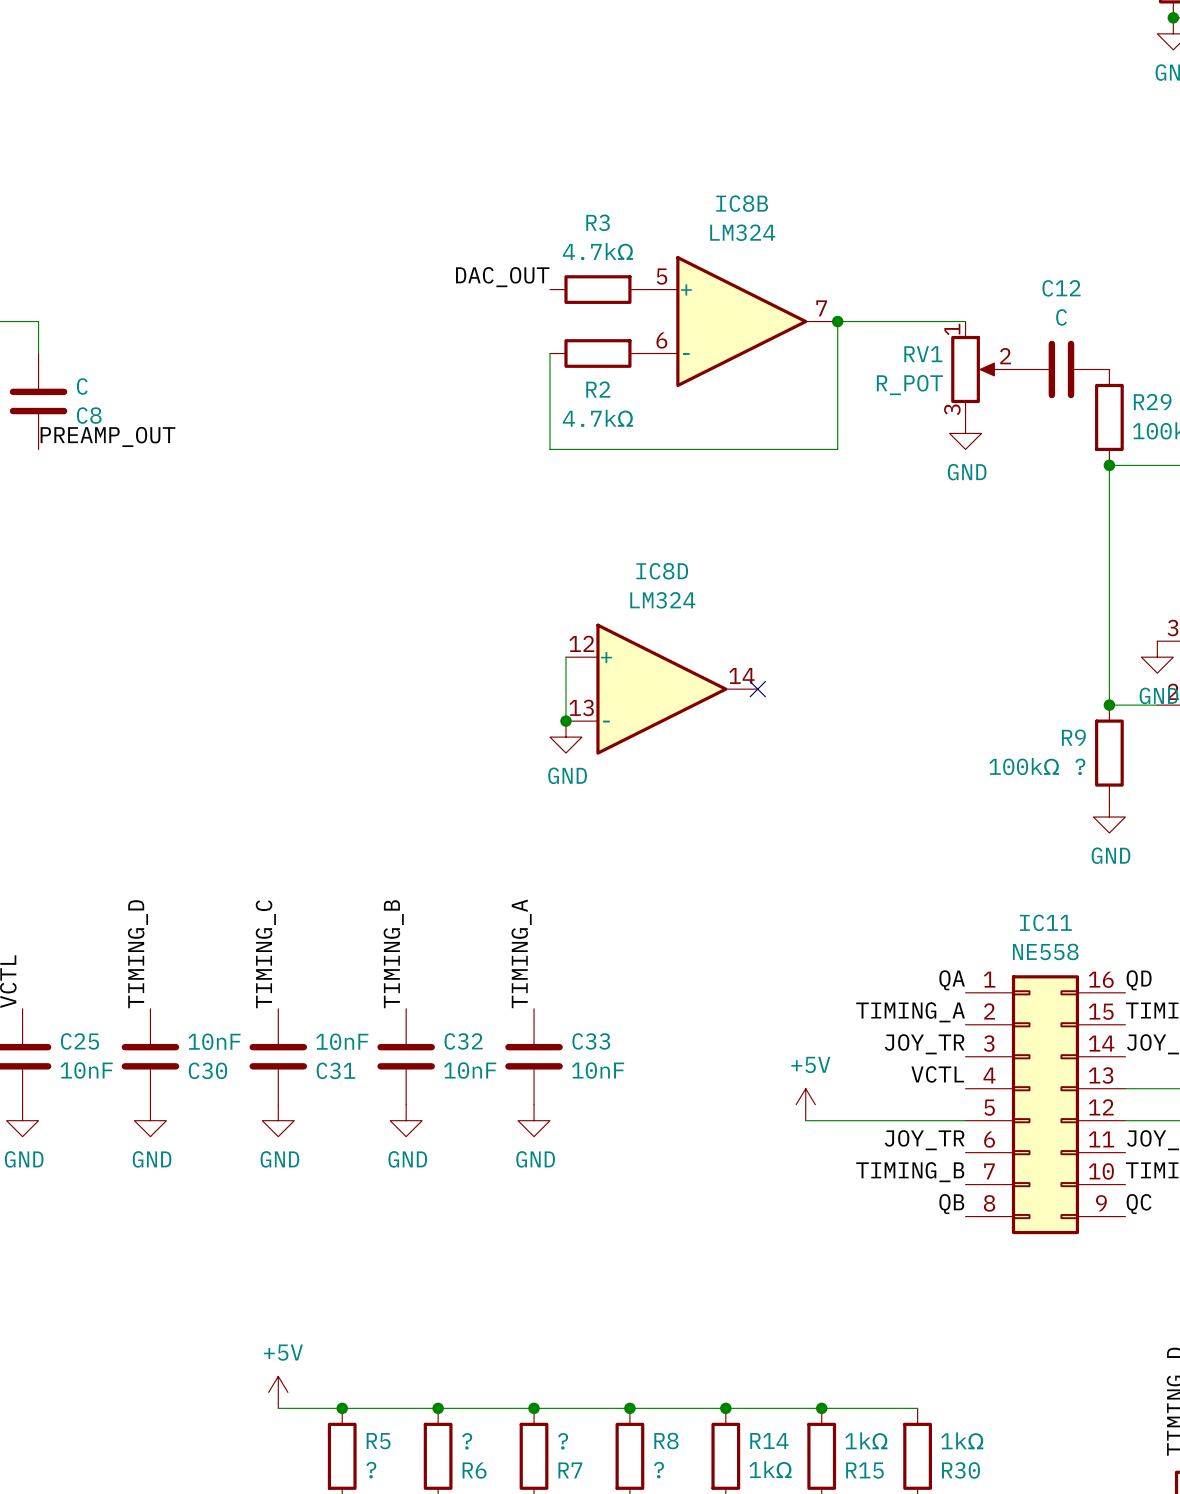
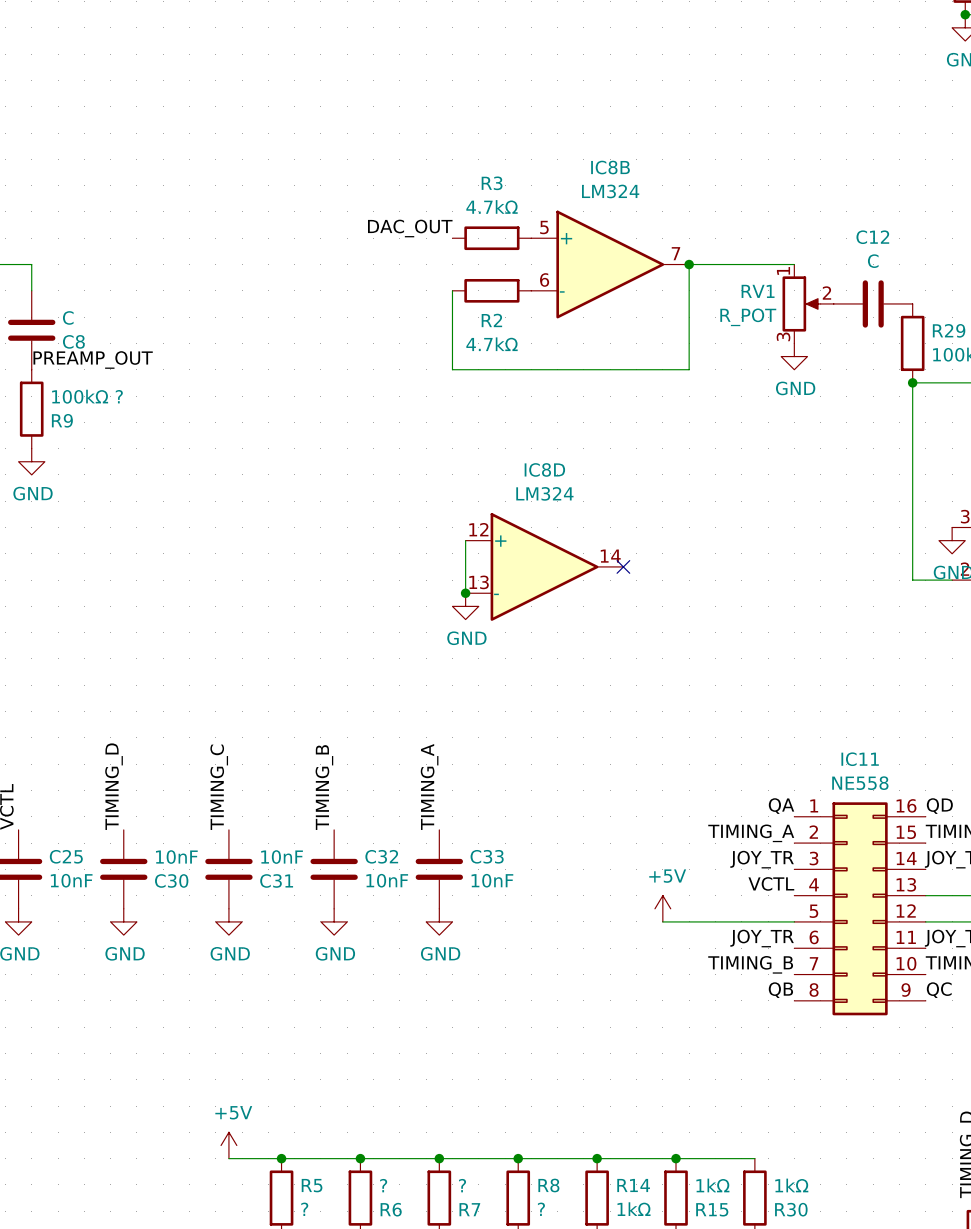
power symbol: none -> GND (31, 461)
junction: (1109, 705) -> none
R9 name position: R9 (1073, 737) -> R9 (62, 420)
R9 position: (1109, 753) -> (31, 409)
R9 value position: 100kΩ ? (1037, 766) -> 100kΩ ? (87, 396)
power symbol: GND (1109, 817) -> none

